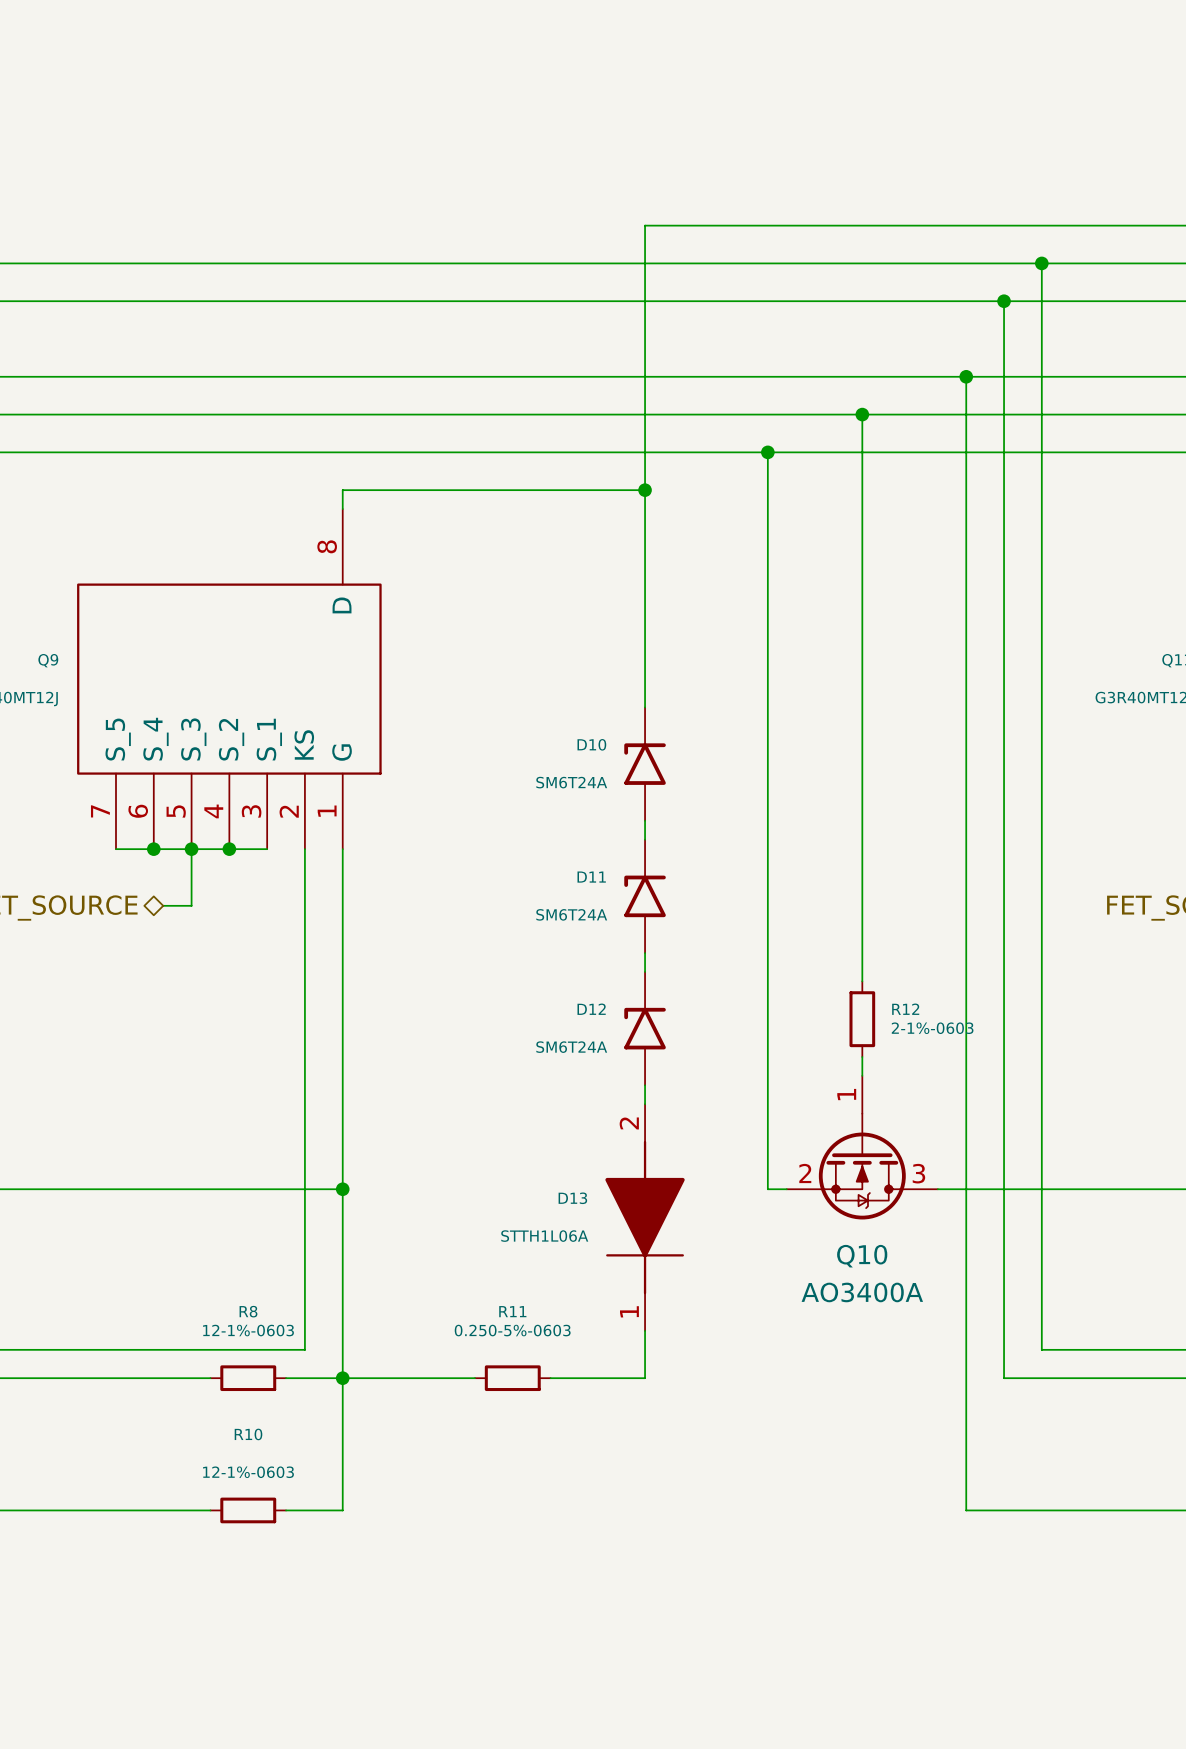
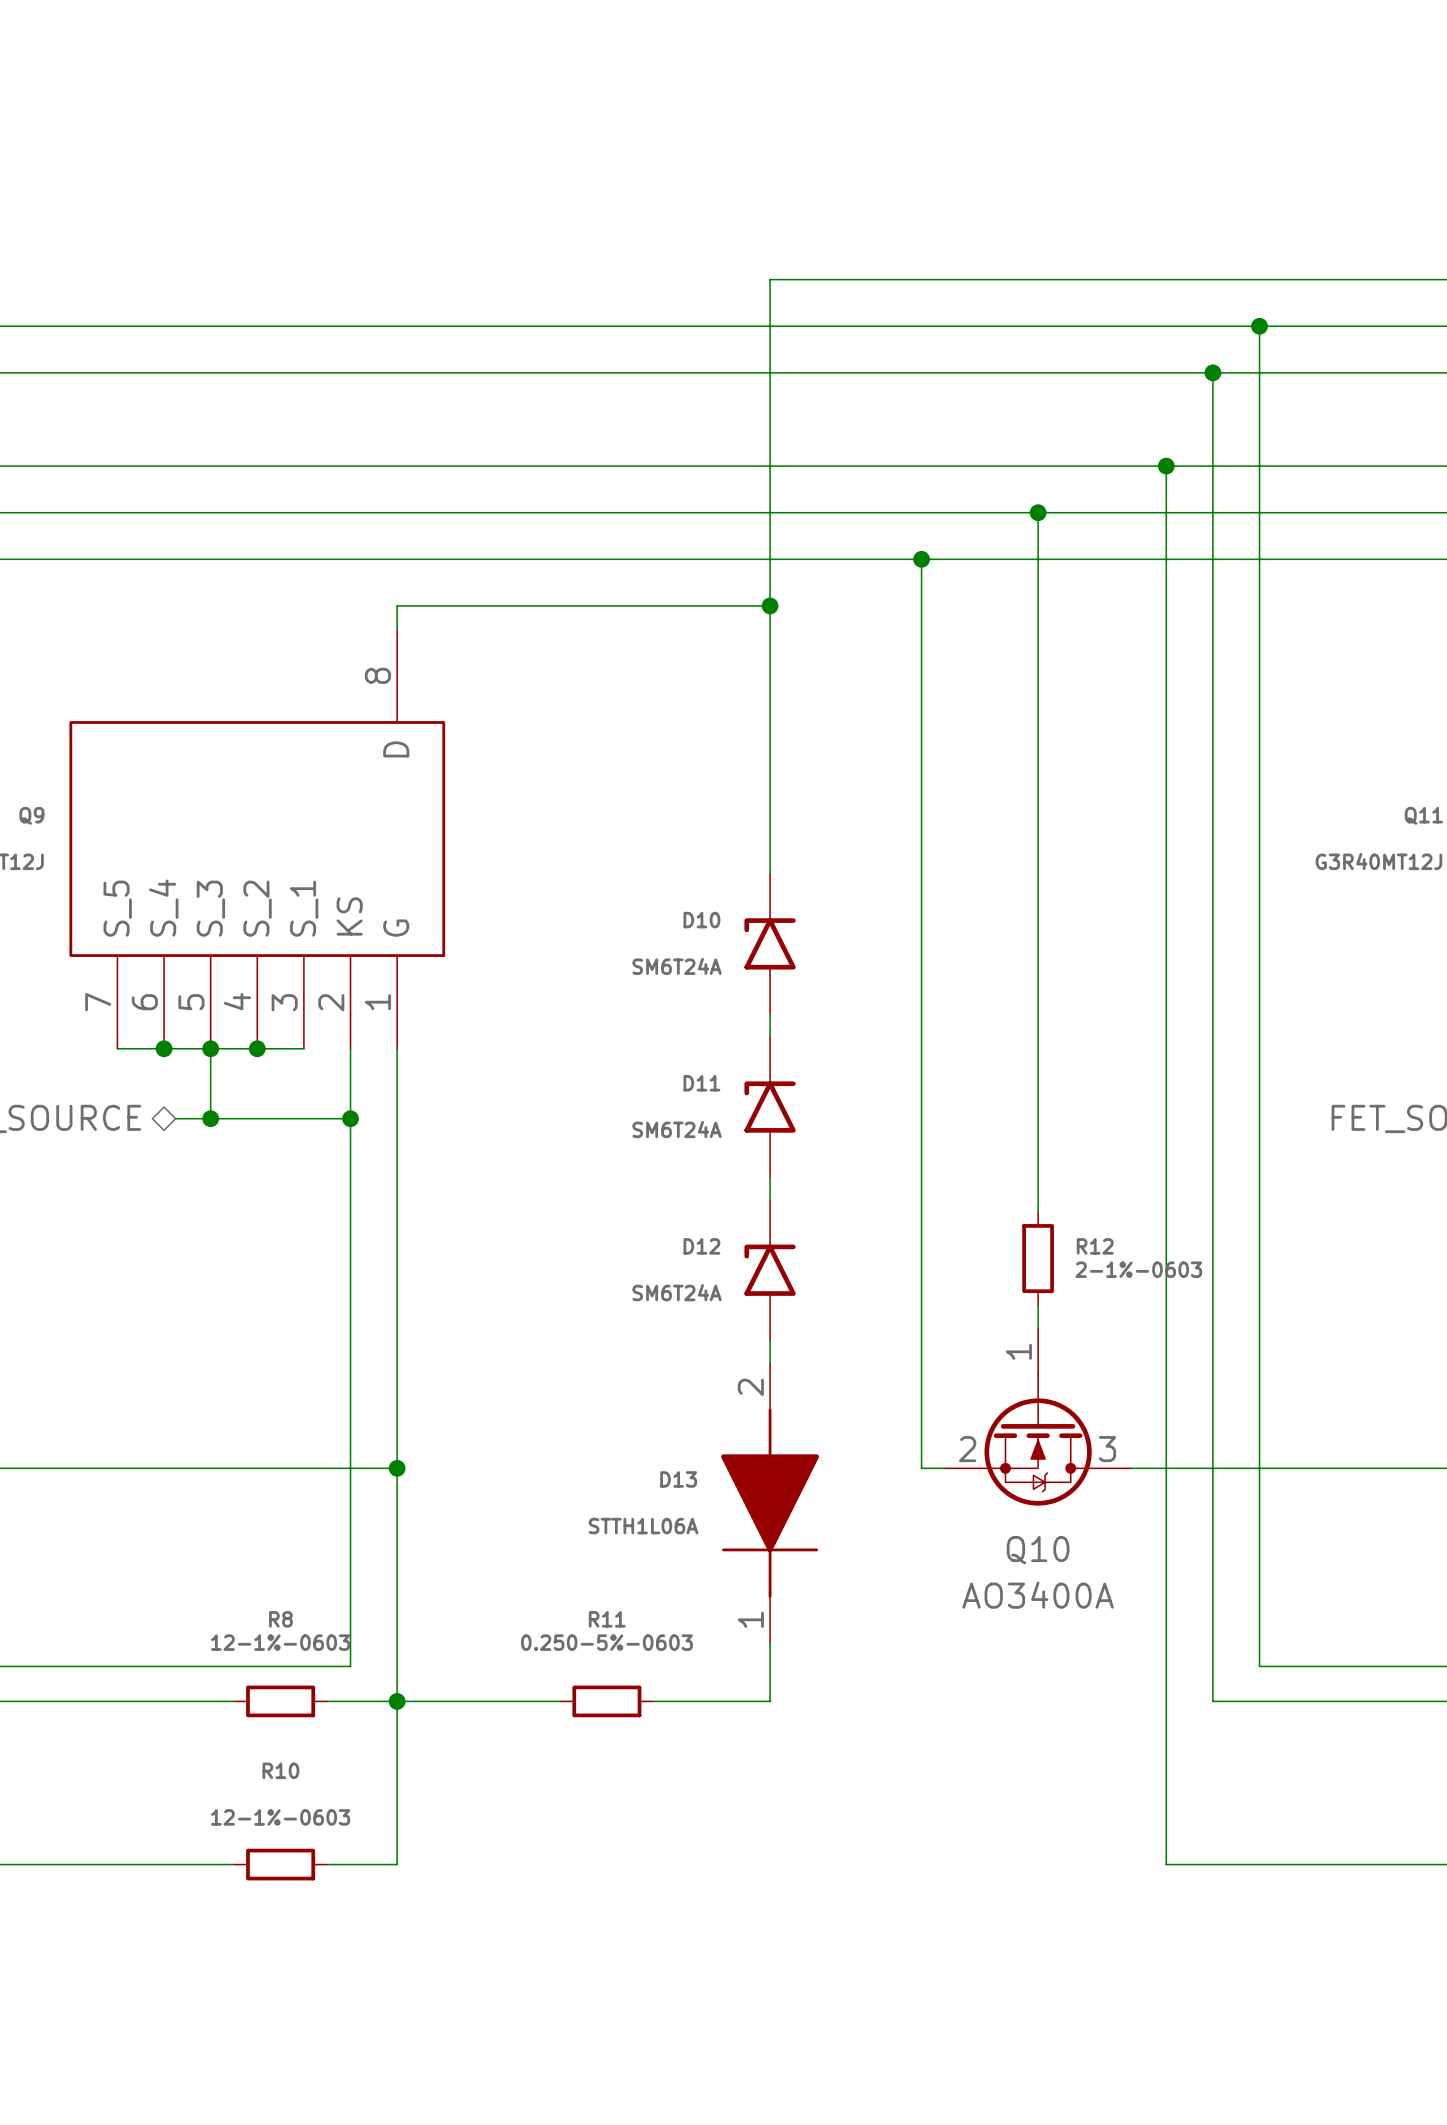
wire: none -> (210, 1118) (350, 1118)
junction: none -> (210, 1118)
junction: none -> (350, 1118)

